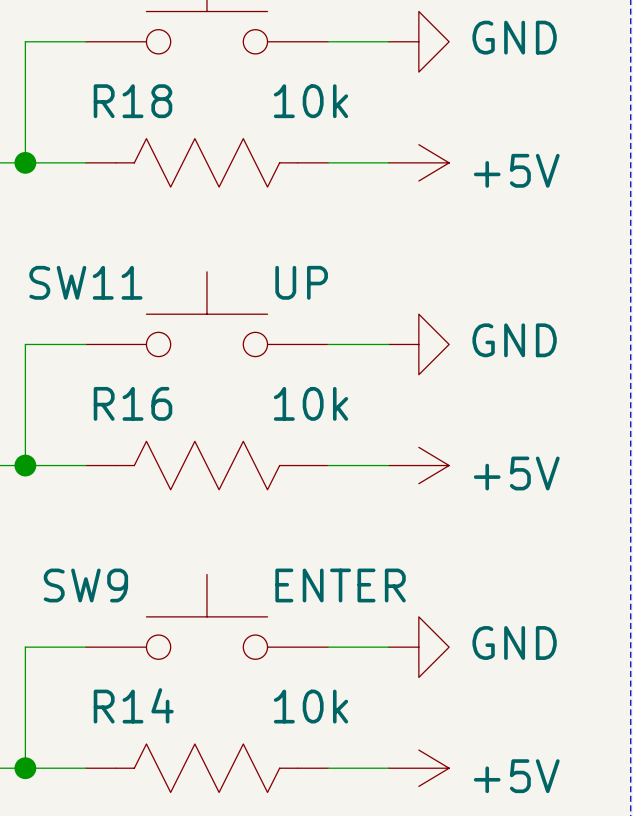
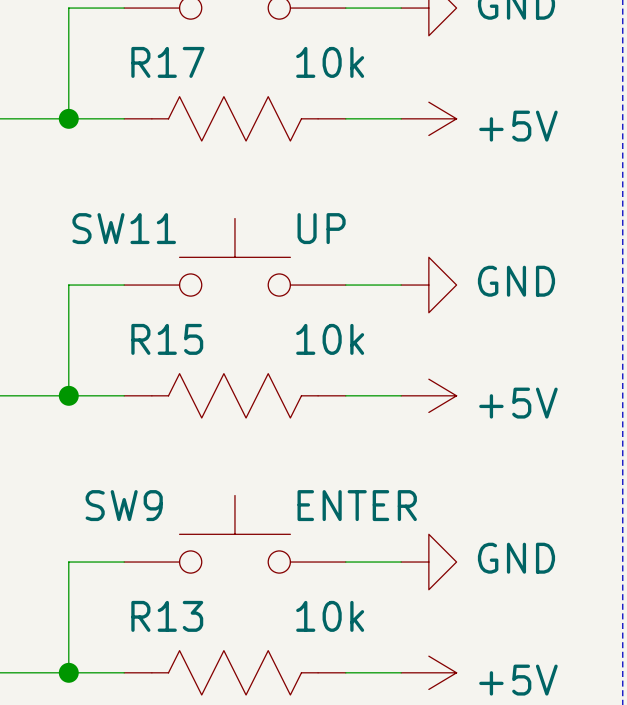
R18 name: R18 (132, 101) -> R17 (167, 62)
R16 name: R16 (132, 403) -> R15 (167, 339)
R14 name: R14 (133, 705) -> R13 (167, 616)

